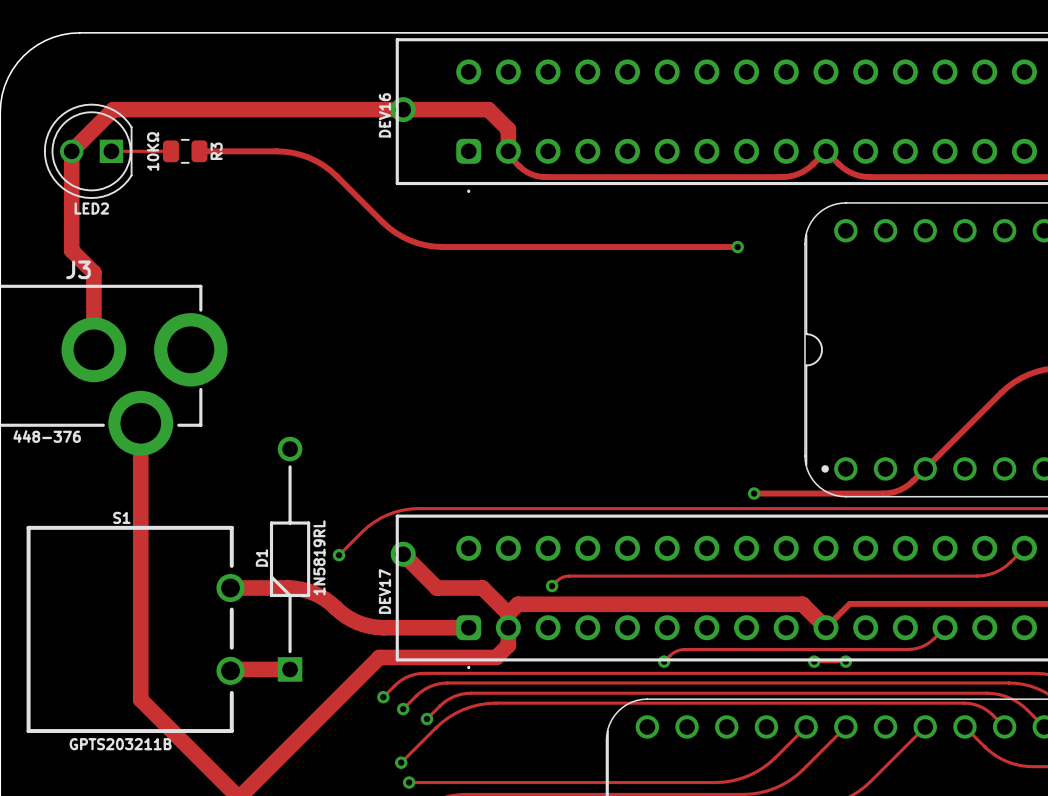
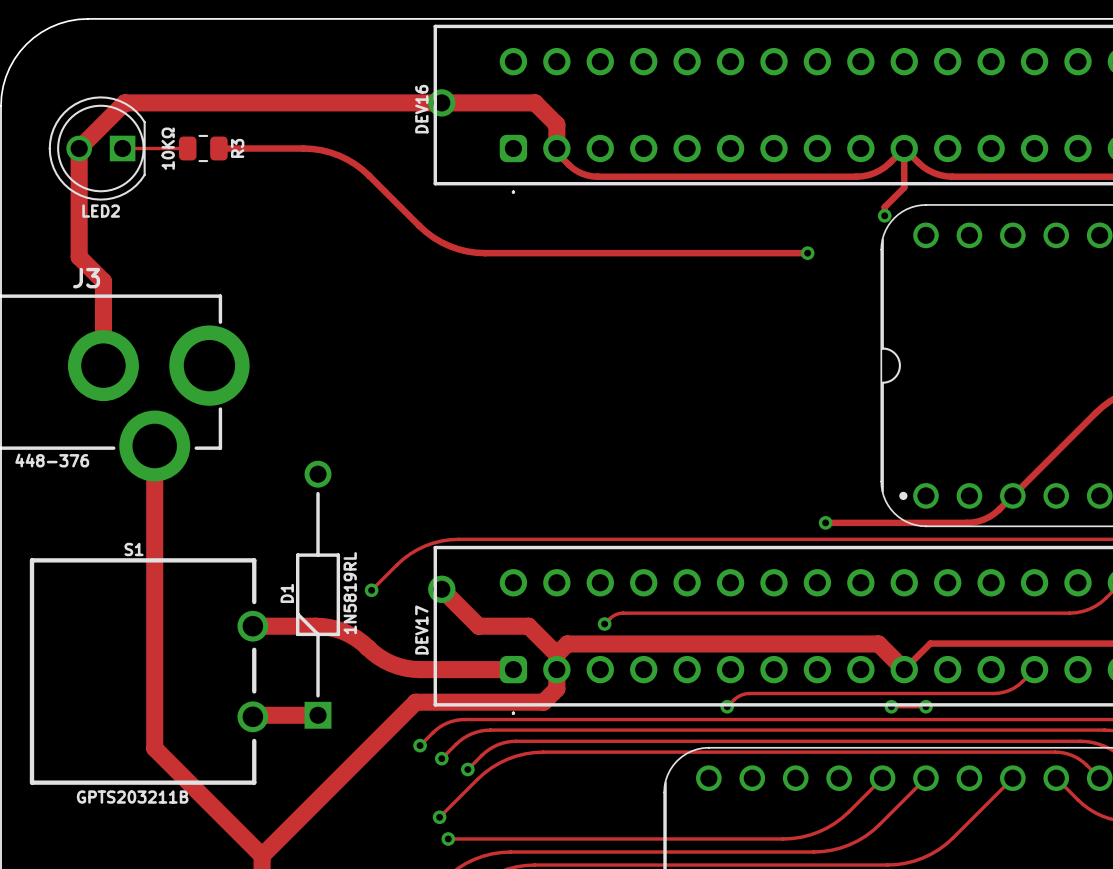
track: none -> (904, 148) (904, 187) (884, 207) (884, 215)
via: none -> (884, 215)

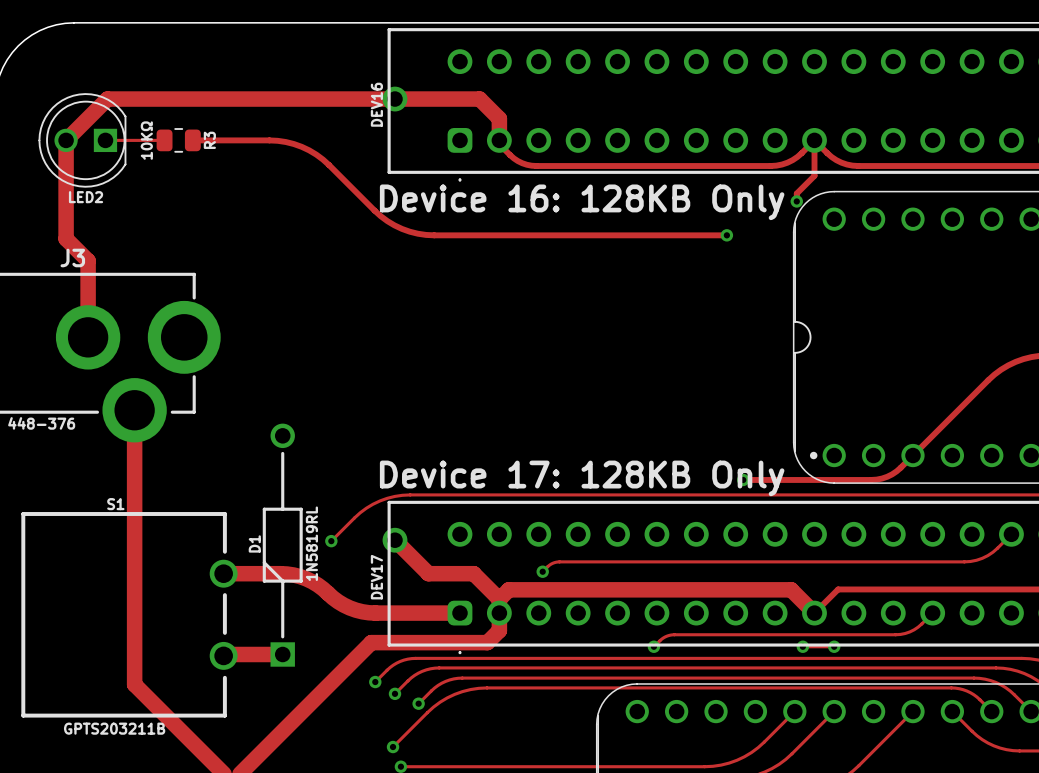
text: none -> Device 16: 128KB Only (582, 202)
text: none -> Device 17: 128KB Only (582, 478)

